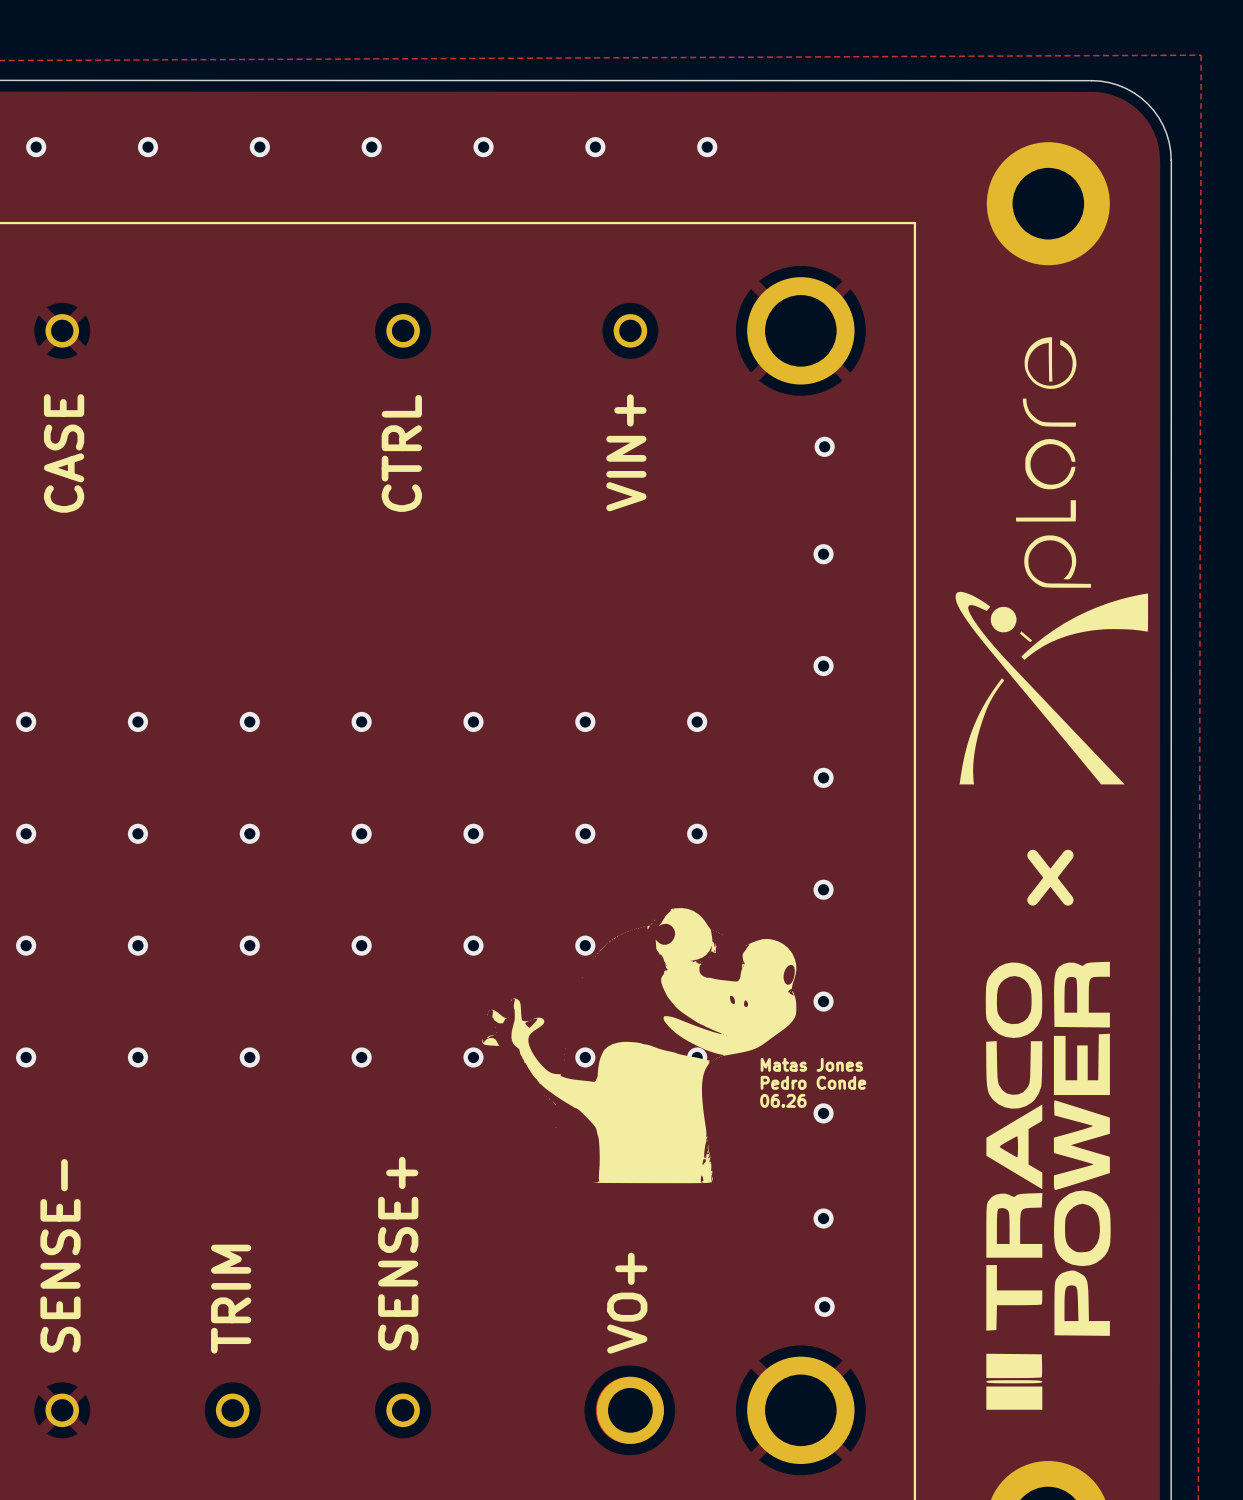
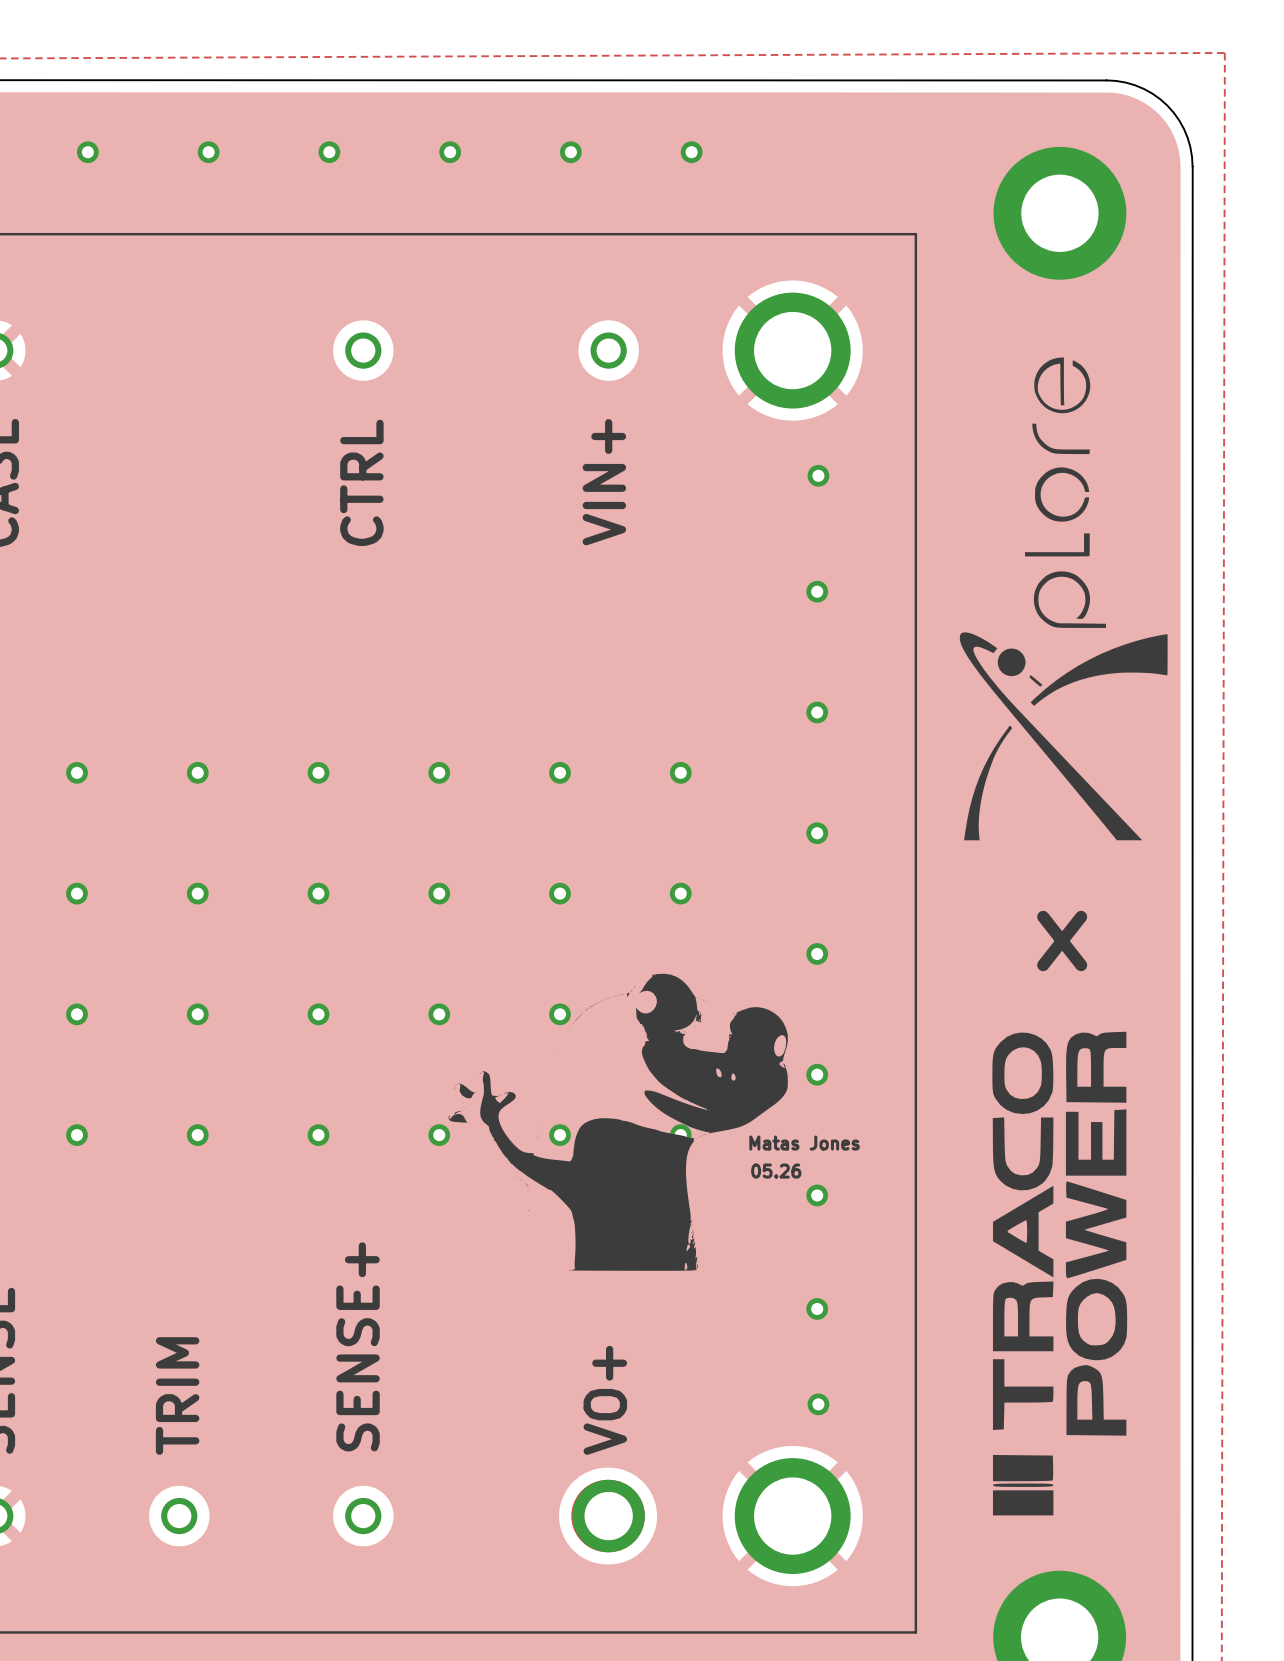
text: Pedro Conde (813, 1082) -> none
text: 06.26 (783, 1100) -> 05.26 (776, 1171)

